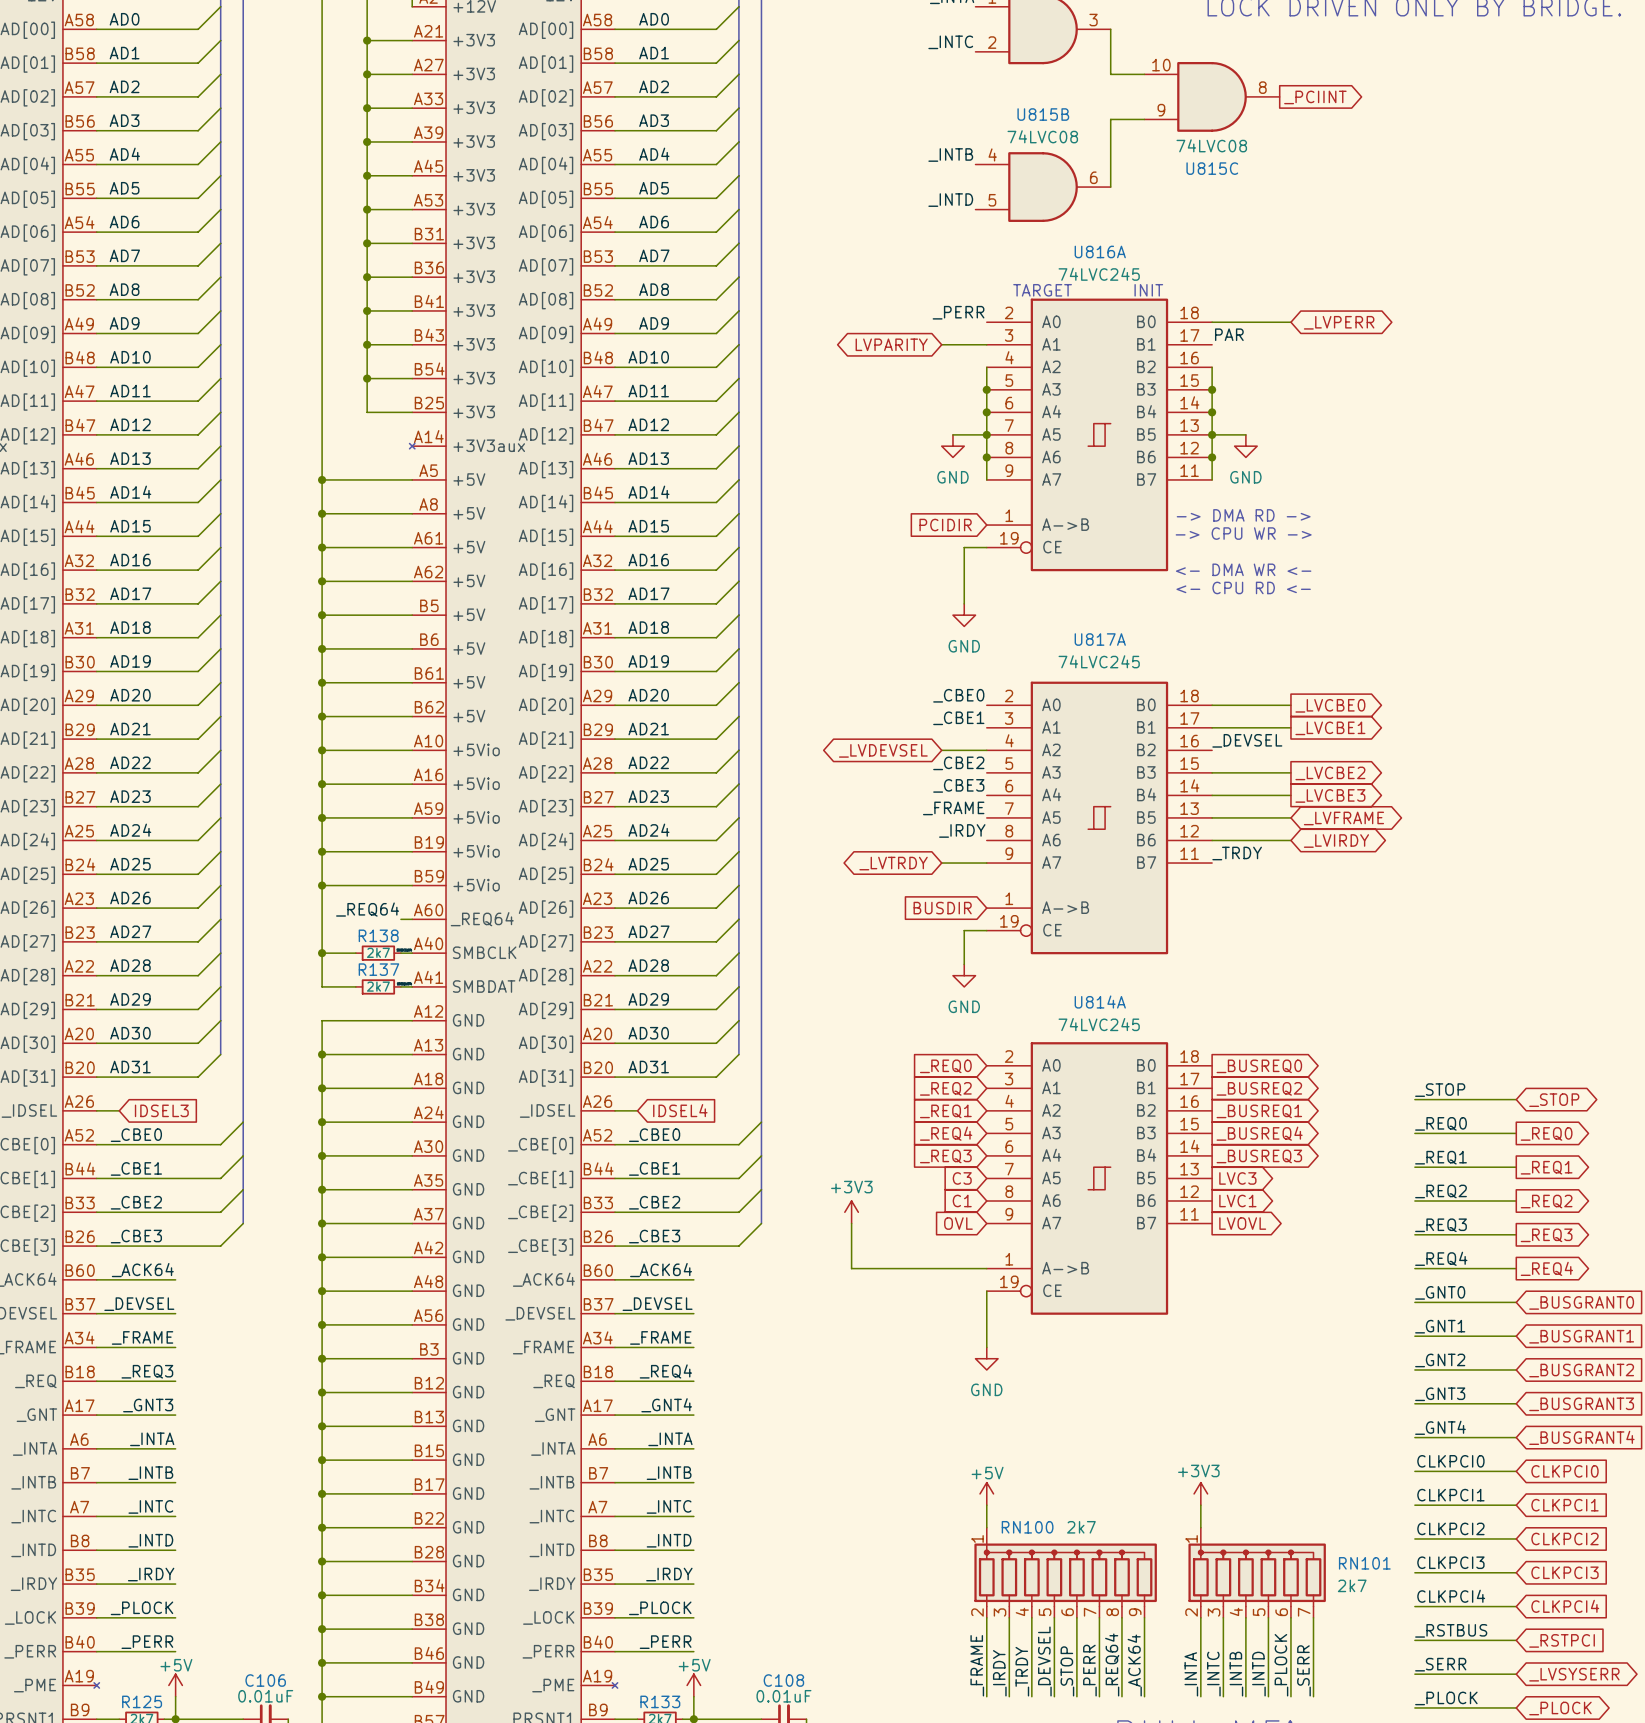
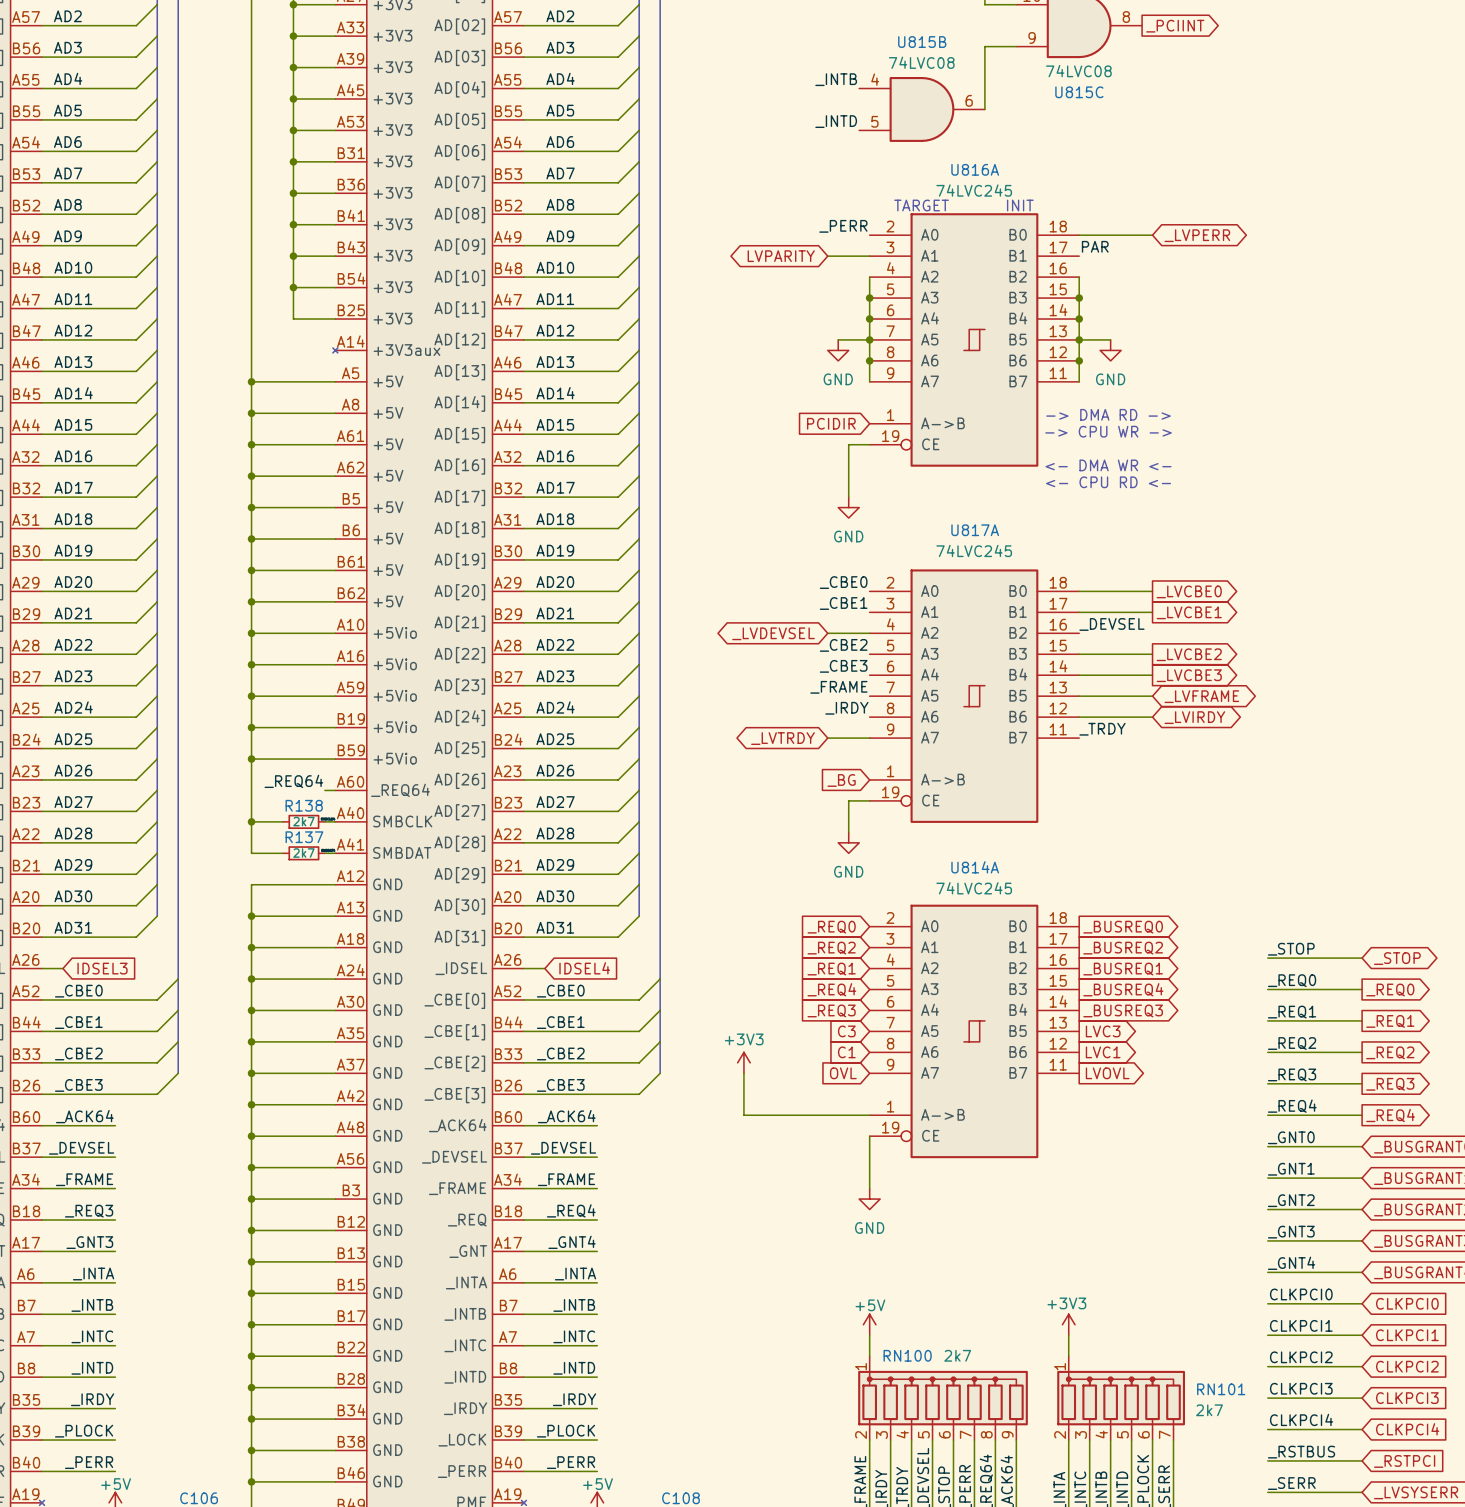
global label: BUSDIR (942, 908) -> _BG (841, 780)

